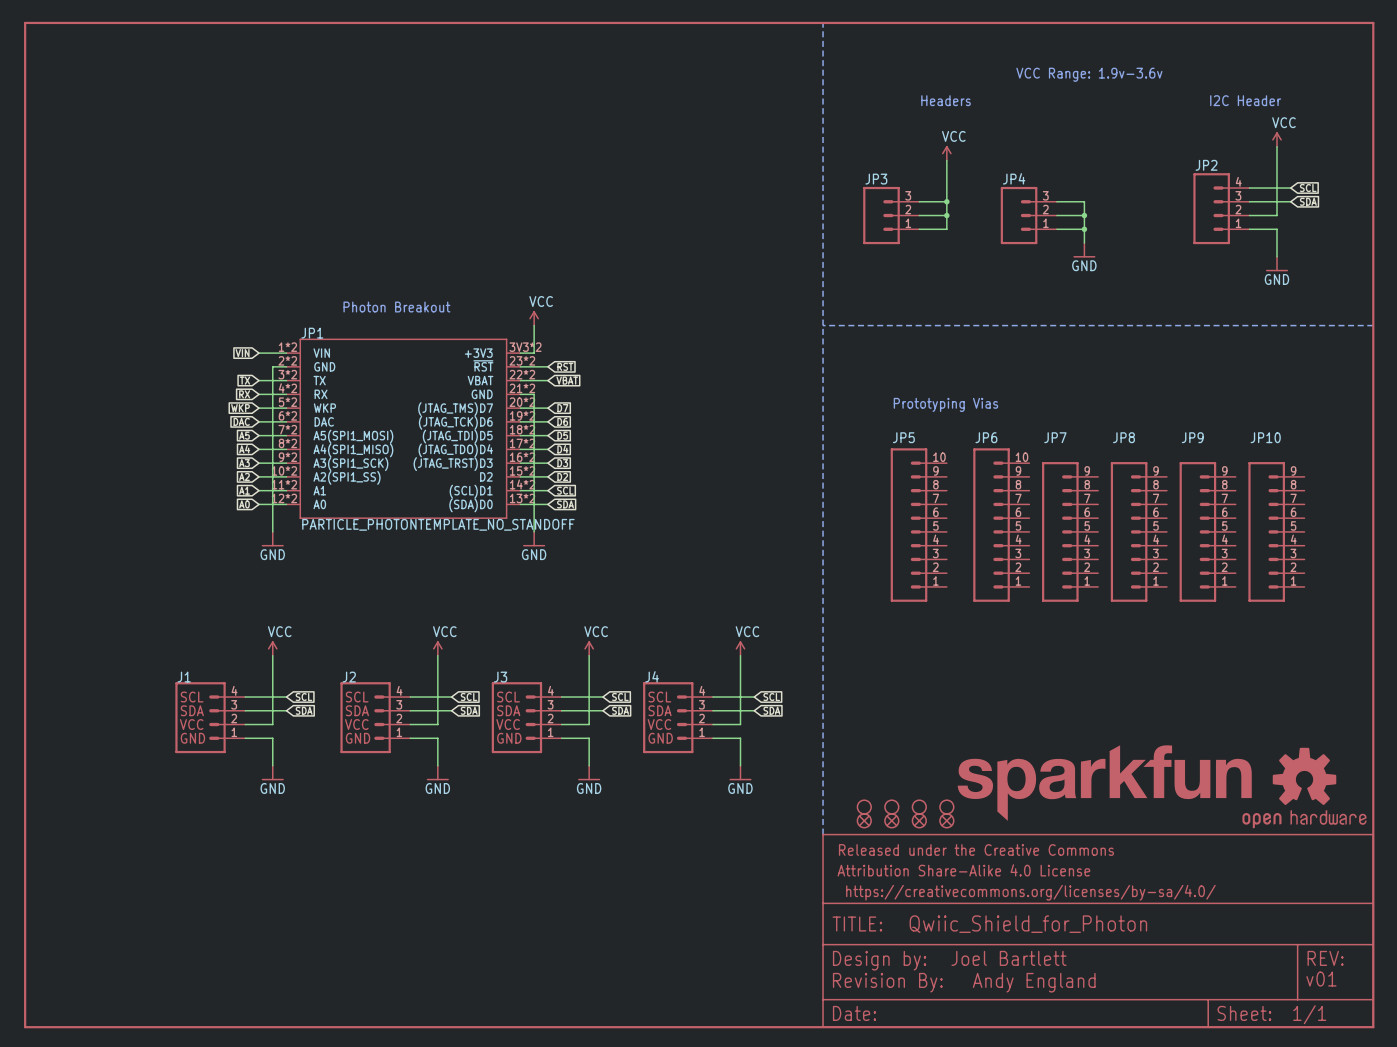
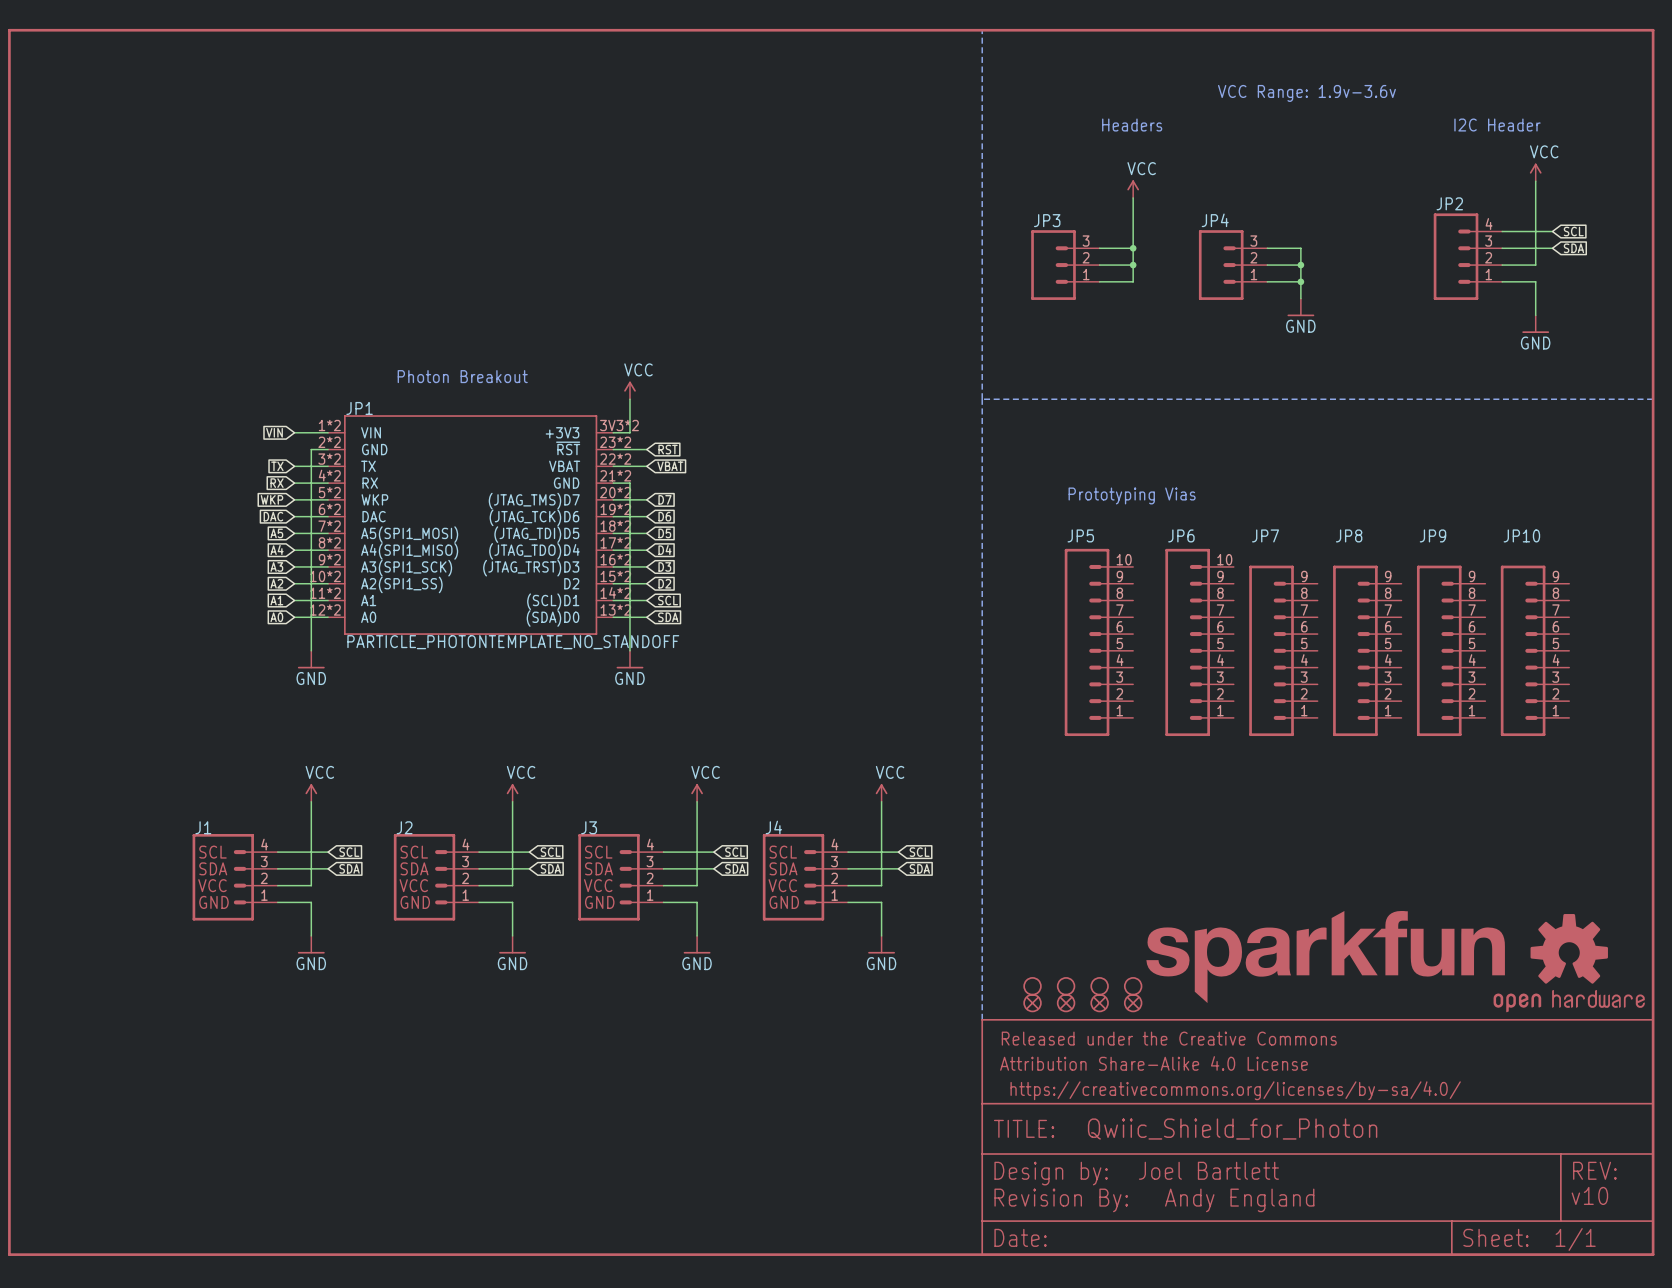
text: v01 (1321, 979) -> v10 (1589, 1195)

